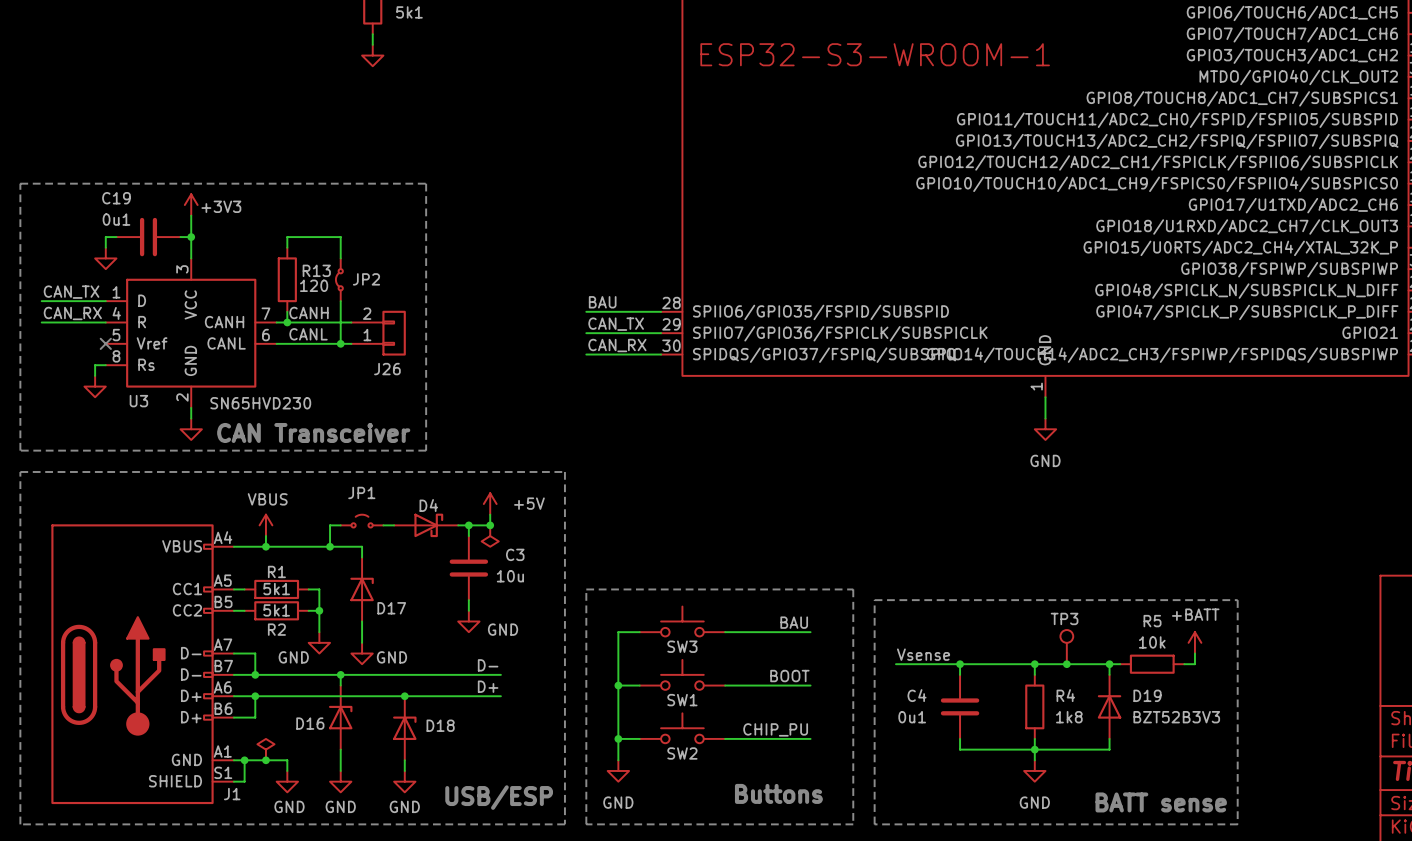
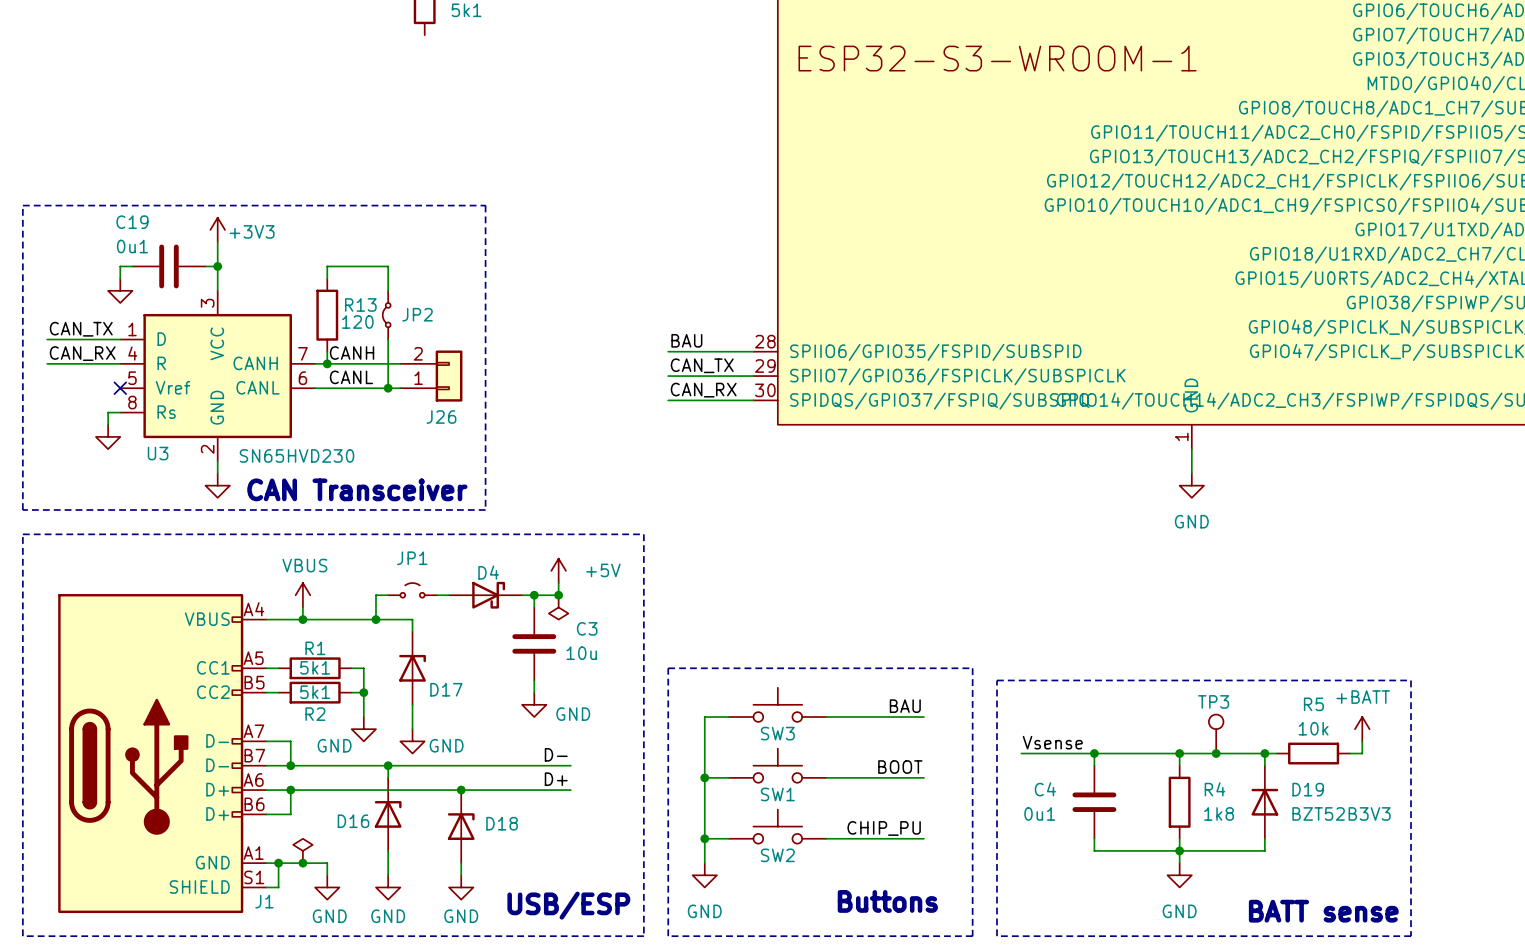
wire: (372, 34) (372, 44) -> none
power symbol: (372, 55) -> none

